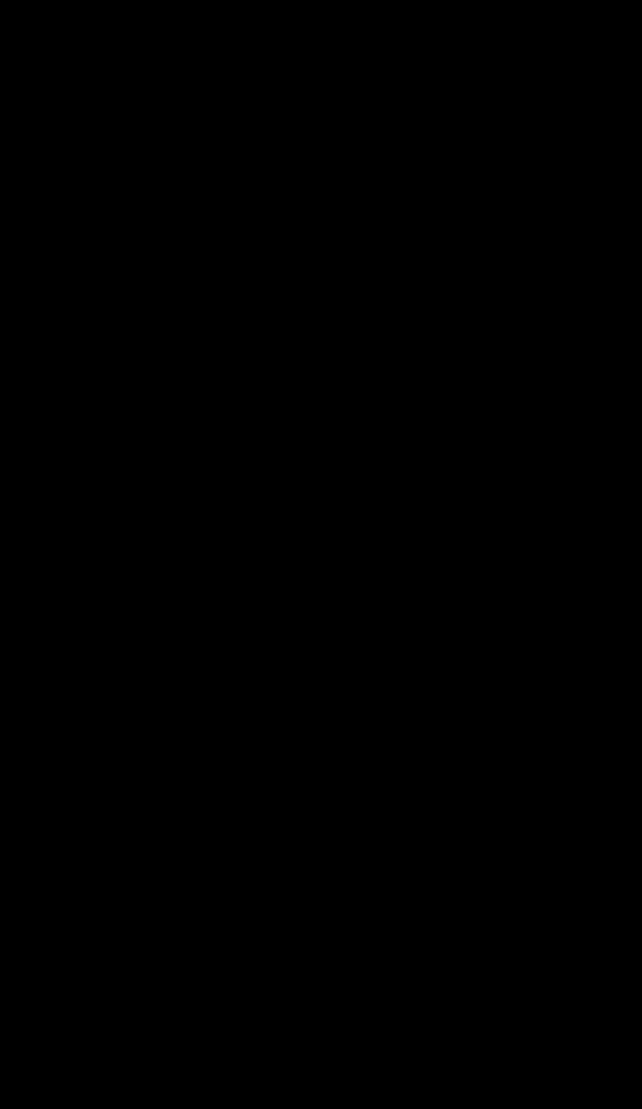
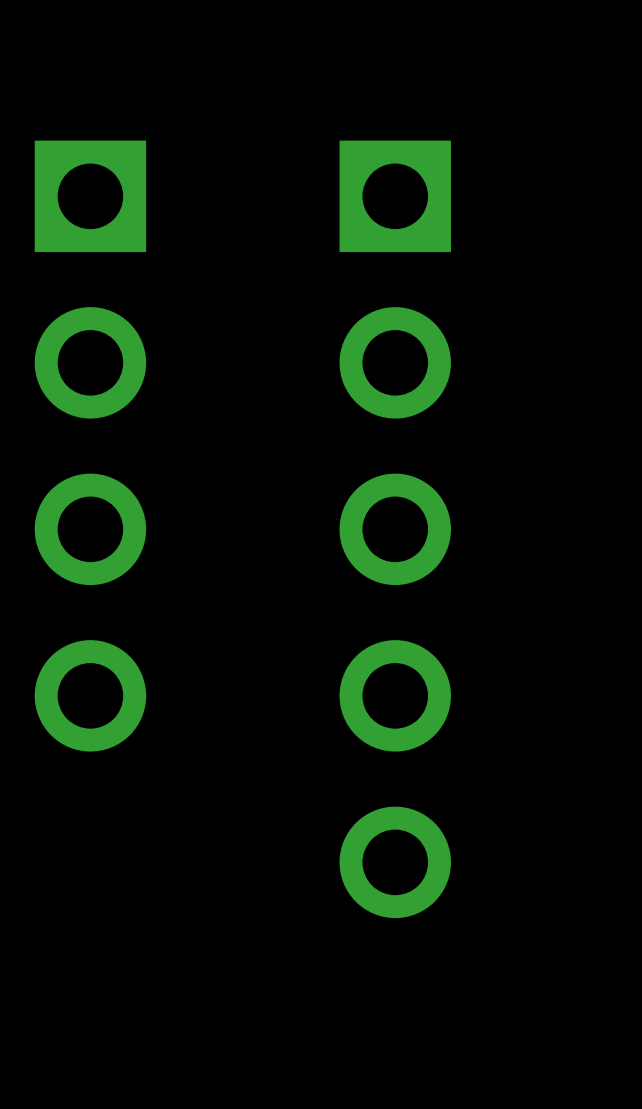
part: none -> (90, 446)
part: none -> (395, 529)

